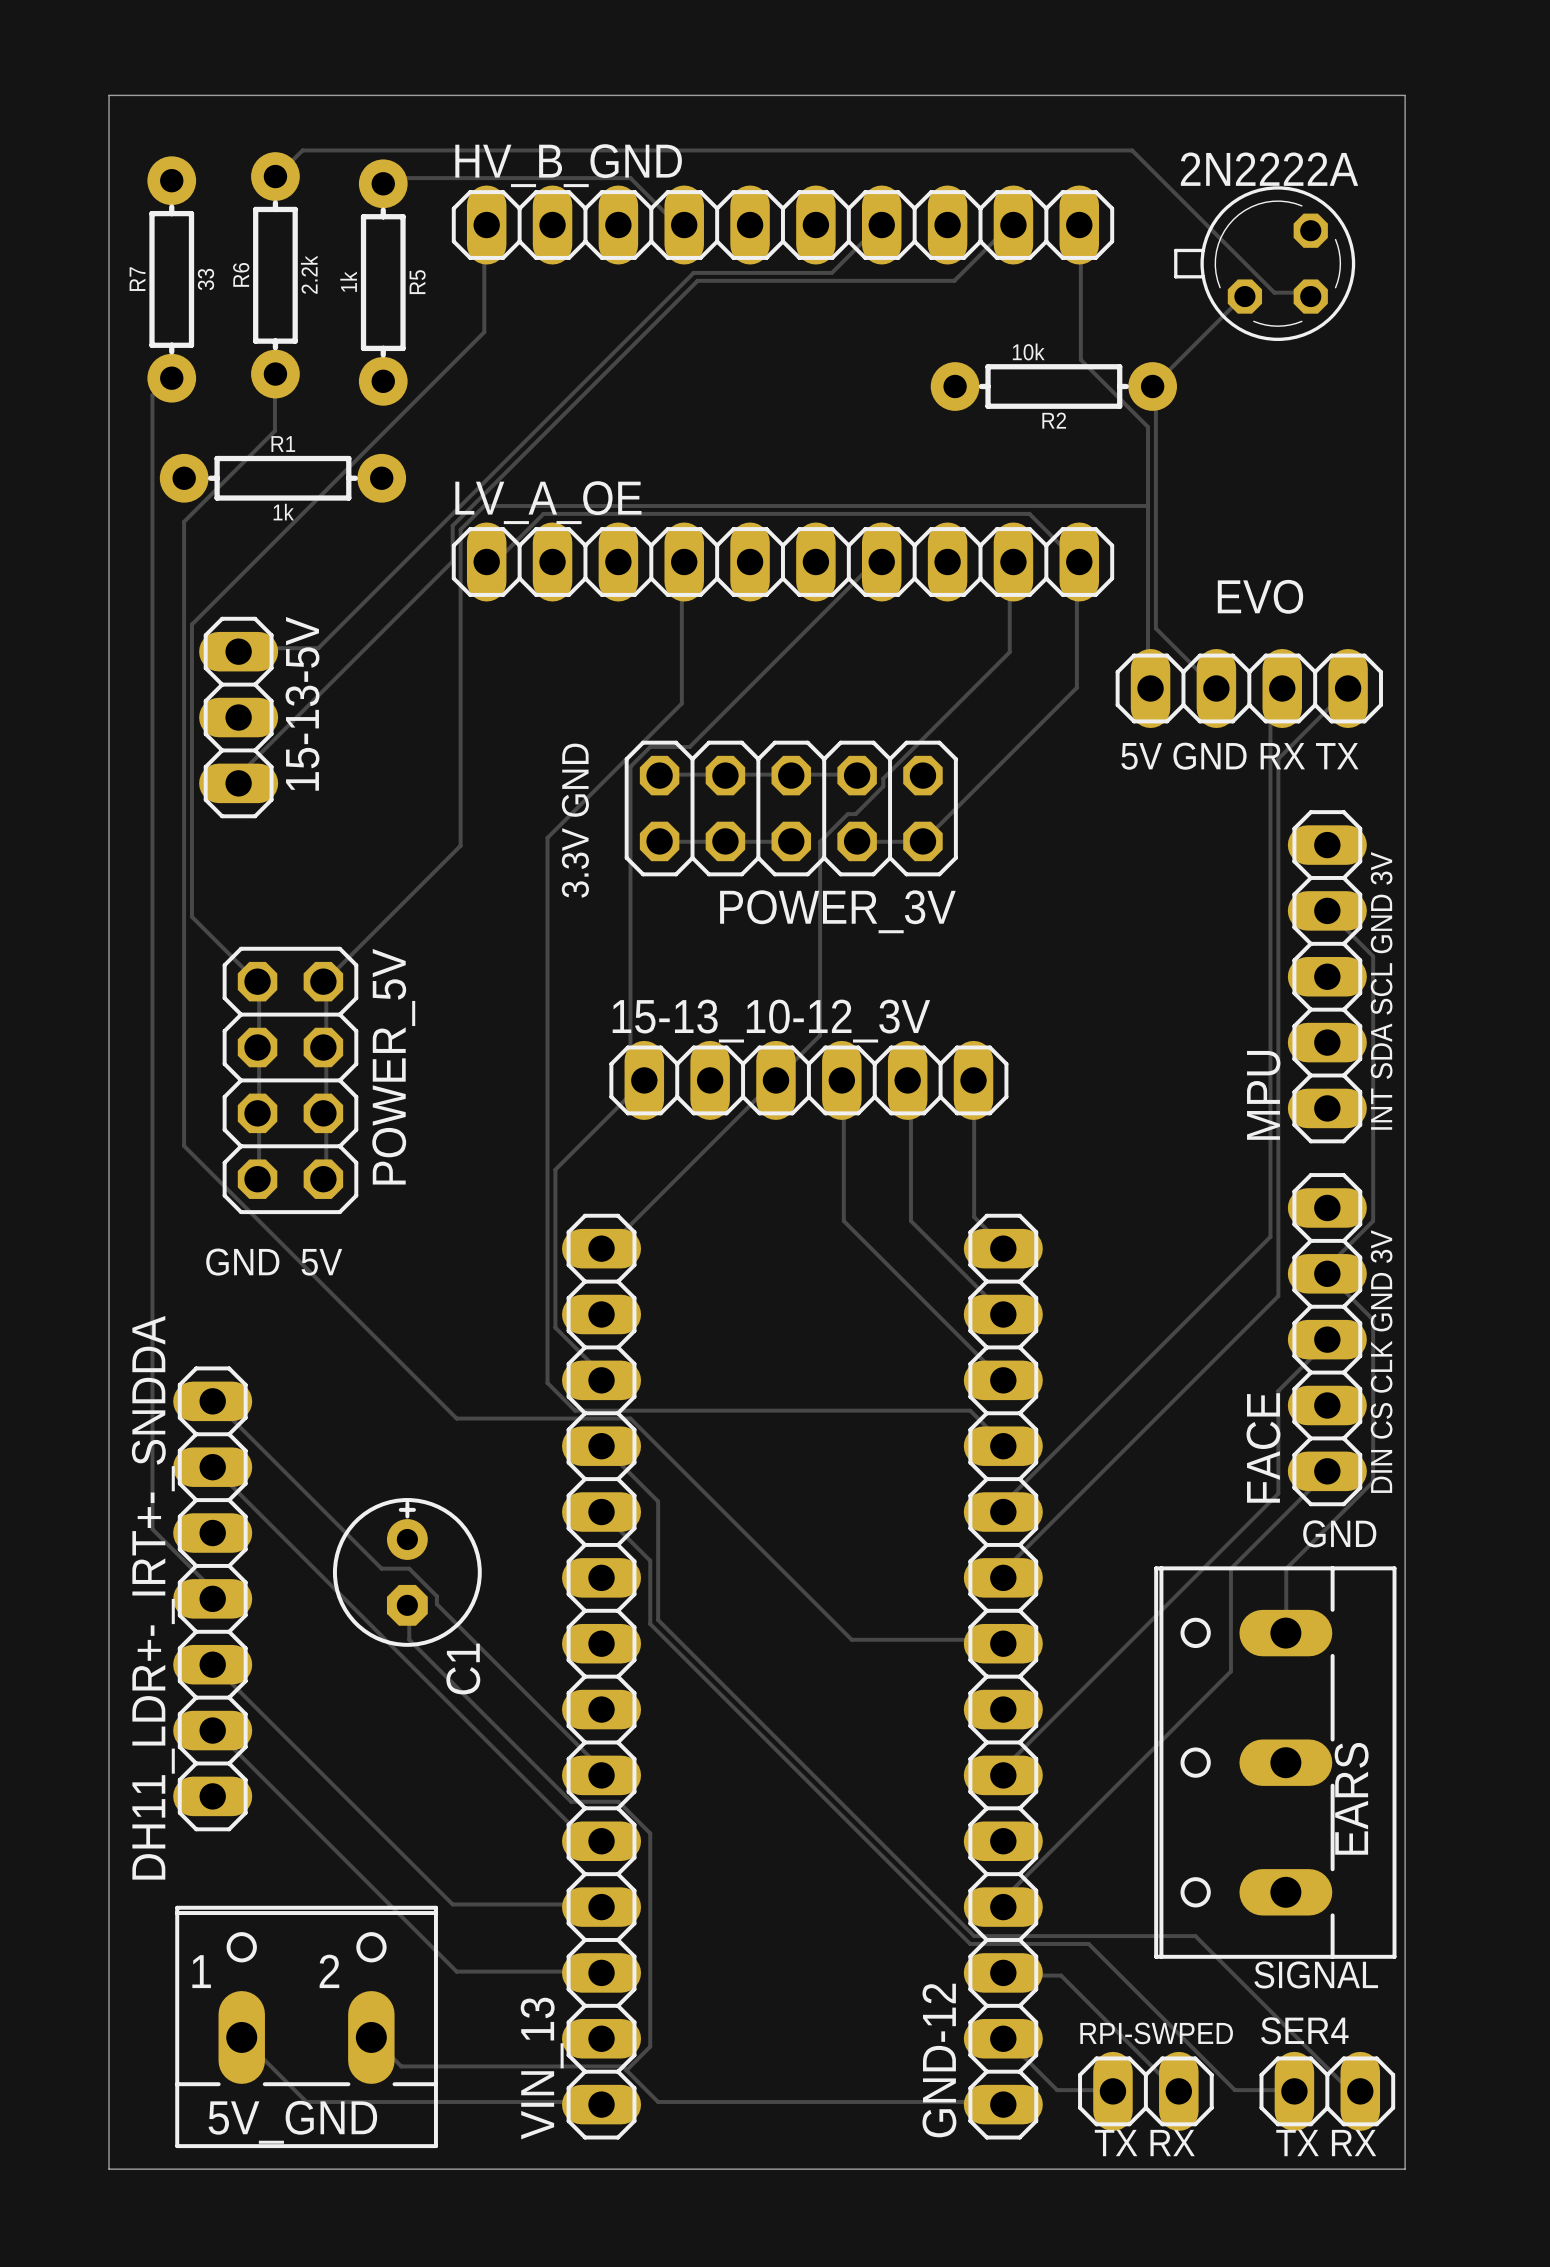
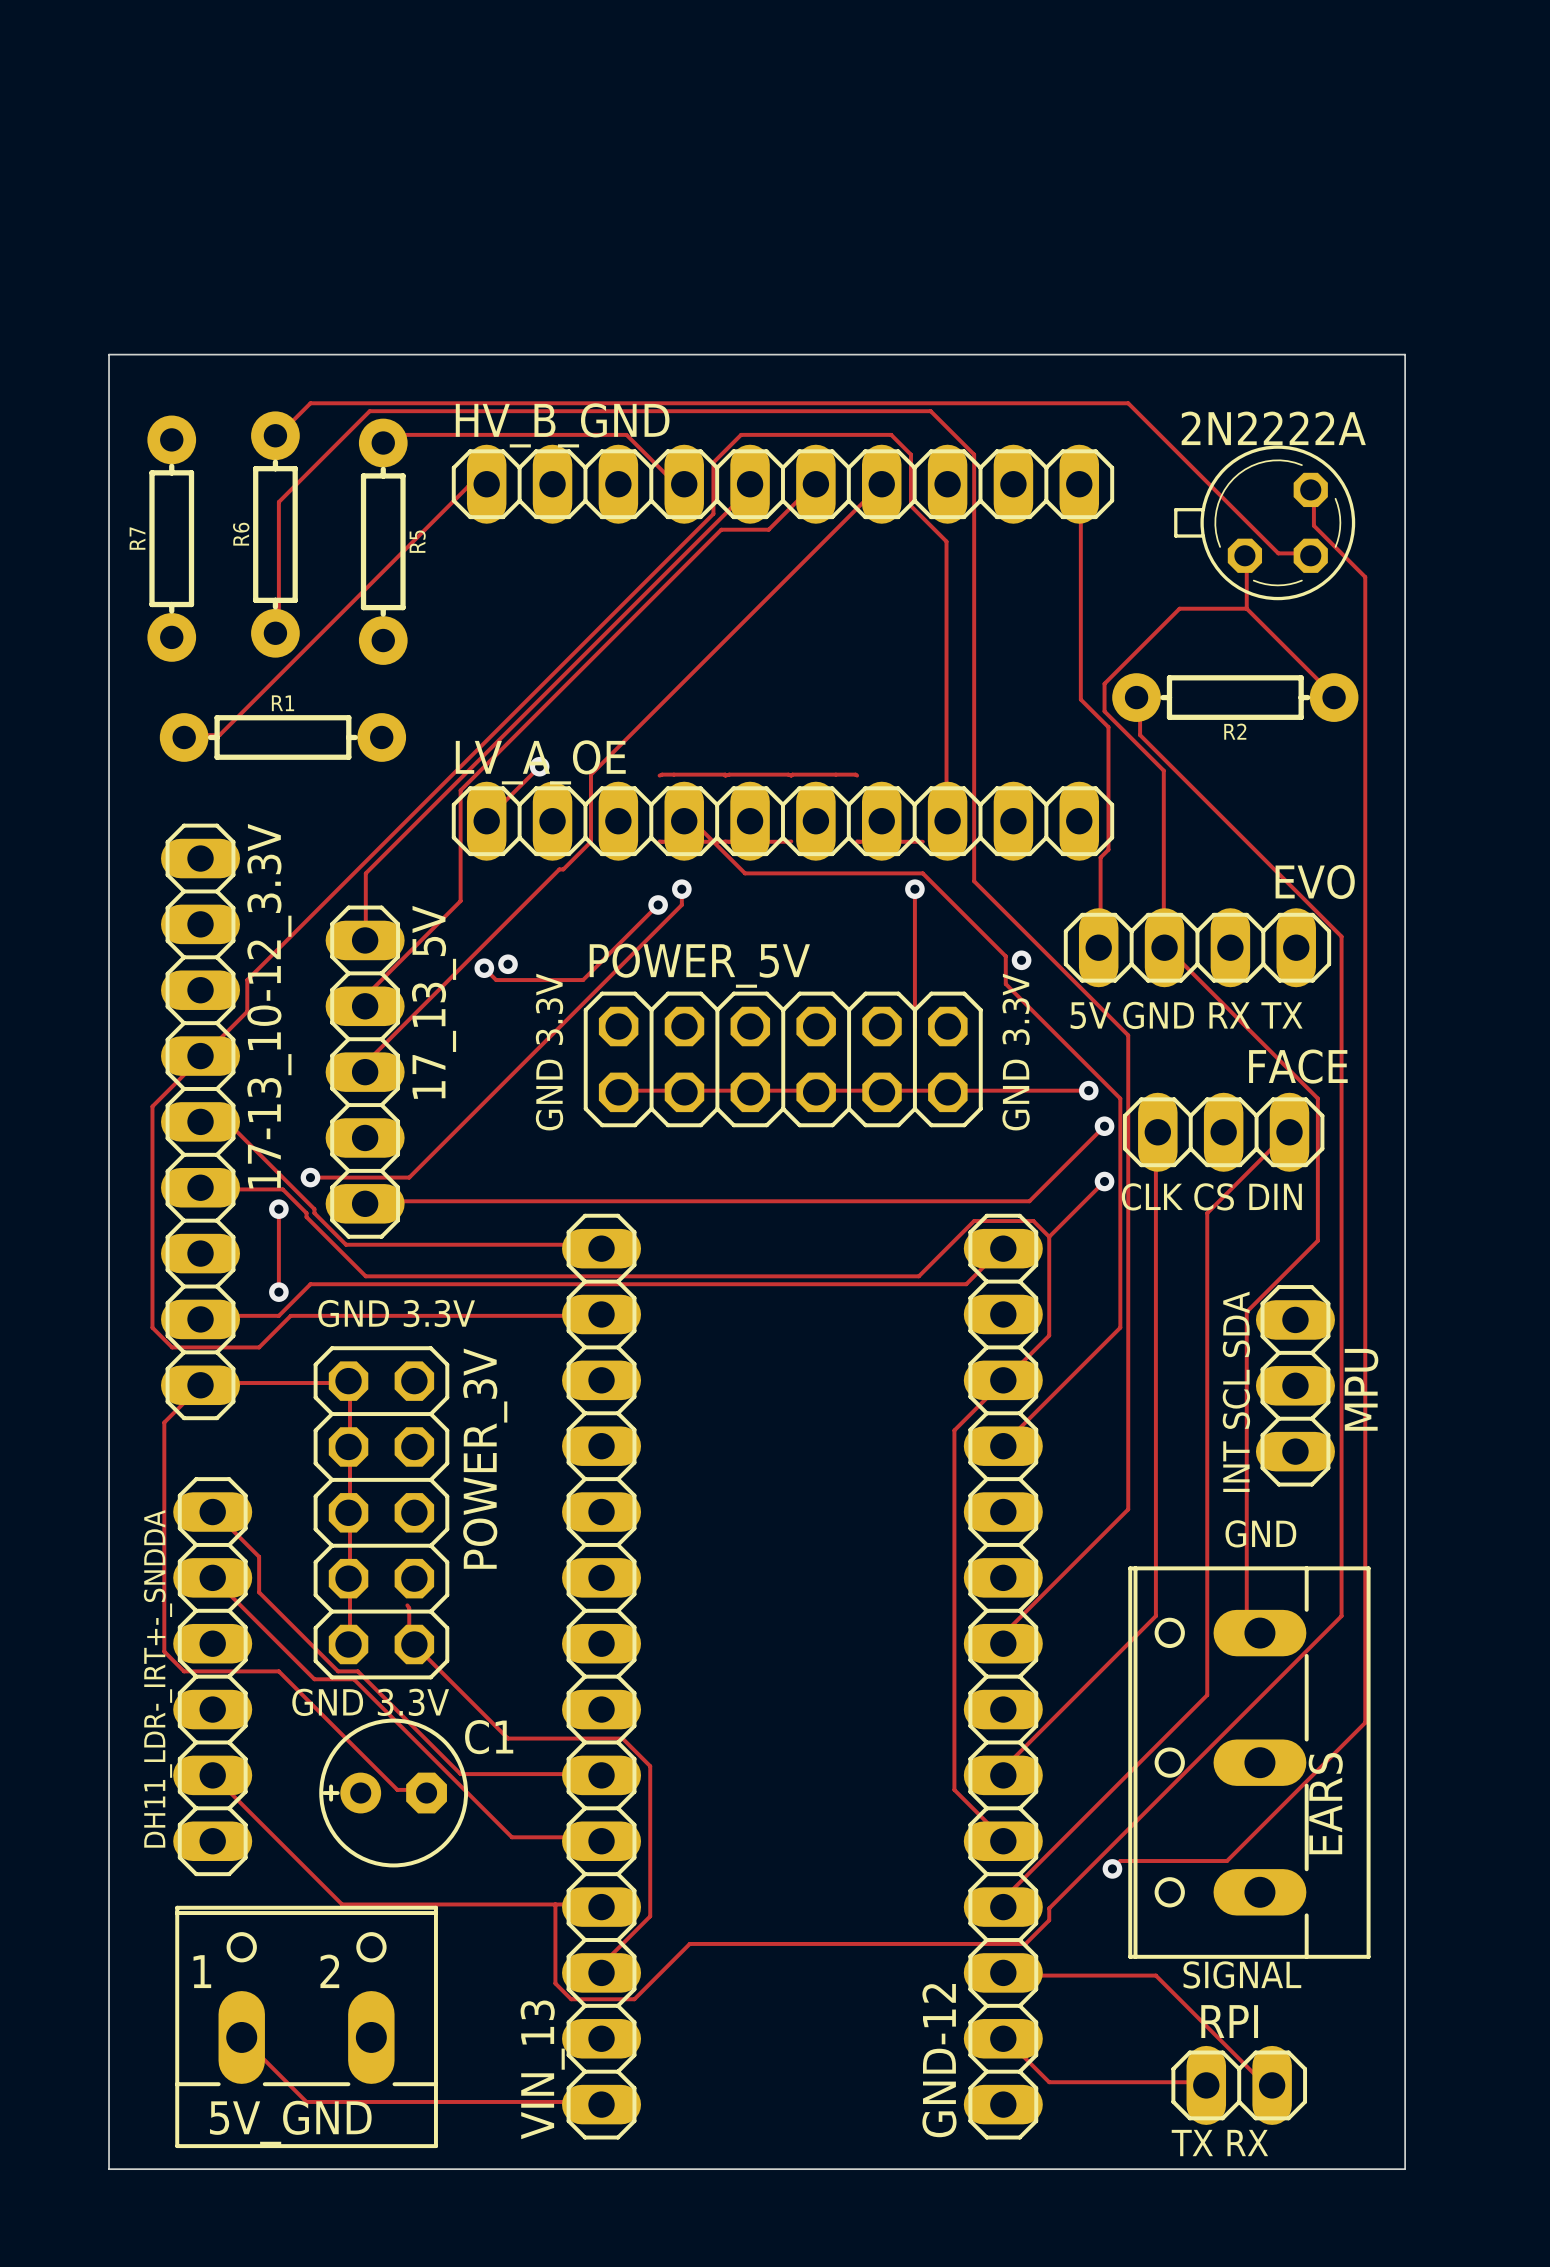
track: (275, 176) (302, 150) (1132, 150) (1274, 292) (1309, 292) (1310, 296) -> none
track: (383, 183) (389, 178) (630, 178) (673, 221) (681, 221) (684, 225) -> none
track: (486, 225) (484, 225) (484, 332) (191, 624) (191, 916) (259, 984) (259, 1047) (257, 1047) (259, 1051) (259, 1110) (257, 1113) (259, 1114) (259, 1177) (257, 1179) -> none
HV_B_GND position: (782, 225) -> (782, 484)
track: (881, 225) (831, 272) (693, 272) (318, 648) (239, 648) (238, 651) -> none
track: (1013, 225) (1009, 225) (954, 280) (697, 280) (452, 525) (452, 561) (239, 774) (238, 783) -> none
track: (1079, 225) (1080, 225) (1080, 359) (1147, 426) (1147, 687) (1150, 688) -> none
2N2222A position: (1264, 263) -> (1264, 522)
R6 value: 2.2k (309, 274) -> none
R6 position: (275, 275) -> (275, 534)
R7 position: (171, 279) -> (171, 538)
R7 value: 33 (205, 279) -> none
R5 value: 1k (348, 281) -> none
R5 position: (383, 282) -> (383, 541)
track: (1244, 296) (1152, 386) (1155, 387) (1155, 628) (1216, 688) -> none
R2 value: 10k (1028, 351) -> none
board edge: (109, 354) (109, 95) (1405, 95) (1405, 354) -> (109, 354) (1405, 354)
track: (275, 374) (274, 430) (184, 521) (184, 1145) (456, 1418) (630, 1418) (851, 1639) (1001, 1639) (1003, 1643) -> (275, 633) (278, 632) (278, 502) (369, 411) (930, 411) (974, 454) (974, 881) (1128, 1035) (1128, 1509) (1005, 1631) (1005, 1639) (1003, 1643)
track: (171, 378) (152, 395) (152, 1106) -> (947, 821) (946, 541) (910, 505) (910, 454) (891, 434) (741, 434) (713, 462) (713, 513) (247, 980) (247, 1011) (203, 1055) (200, 1056) (199, 1059) (152, 1106)
R2 position: (1053, 386) -> (1235, 697)
track: none -> (275, 435) (278, 434) (310, 403) (1128, 403) (1278, 553) (1309, 553) (1310, 555)
track: none -> (383, 443) (393, 434) (626, 434) (673, 482) (684, 484)
R1 position: (282, 478) -> (282, 737)
track: none -> (486, 484) (484, 486) (468, 486) (219, 735) (188, 735) (184, 737)
track: none -> (750, 484) (752, 486) (365, 873) (365, 940)
track: none -> (881, 484) (590, 774) (590, 841) (563, 869) (559, 869) (365, 1063) (365, 1072)
track: none -> (1079, 484) (1080, 486) (1080, 699) (1108, 727) (1108, 849) (1100, 857) (1100, 944) (1098, 947)
track: none -> (1310, 489) (1313, 490) (1313, 525) (1365, 577) (1365, 1722) (1227, 1861) (1120, 1861) (1112, 1868)
track: (1147, 505) (484, 505) (460, 529) (460, 790) -> (815, 484) (768, 529) (721, 529) (460, 790)
R1 value: 1k (283, 512) -> none
track: none -> (1244, 555) (1246, 557) (1246, 608)
track: (486, 561) (496, 561) (543, 513) (1029, 513) (1079, 561) (1076, 565) (1076, 687) (922, 841) -> none
track: (684, 561) (681, 565) (681, 703) (547, 837) (547, 1383) (575, 1410) (970, 1410) (1001, 1442) (1003, 1446) -> (684, 821) (693, 822) (745, 873) (922, 873) (1005, 956) (1005, 984) (1120, 1098) (1120, 1327) (1003, 1446)
LV_A_OE position: (782, 561) -> (782, 821)
track: (881, 561) (879, 565) (871, 565) (689, 746) (650, 746) (630, 766) (630, 1066) (644, 1080) (555, 1169) (555, 1327) (598, 1371) (598, 1379) (601, 1380) -> none
track: (1013, 561) (1009, 565) (1009, 652) (883, 778) (883, 786) (855, 814) (847, 814) (820, 841) (820, 1035) (610, 1244) (602, 1244) (601, 1248) -> (200, 1121) (227, 1122) (314, 1209) (314, 1213) (346, 1244) (598, 1244) (601, 1248)
EVO name position: EVO (1260, 596) -> EVO (1315, 881)
track: none -> (1246, 608) (1334, 697)
track: none -> (1246, 608) (1179, 608) (1104, 683) (1104, 711) (1163, 770) (1164, 947) (1167, 948) (1317, 1098) (1317, 1240) (1246, 1311) (1246, 1620) (1259, 1633)
EVO position: (1249, 688) -> (1197, 947)
track: (1282, 688) (1270, 699) (1270, 1236) (1005, 1501) (1005, 1509) (1003, 1512) -> none
track: (1348, 688) (1278, 758) (1278, 1296) (1005, 1568) (1005, 1576) (1003, 1577) -> none
15-13-5V: (238, 717) -> none
text position: 5V GND RX TX (1239, 756) -> 5V GND RX TX (1186, 1015)
track: none -> (539, 766) (486, 821)
via: none -> (539, 766)
POWER_3V rotation: 0° (791, 808) -> 90° clockwise (381, 1512)
POWER_3V position: (791, 808) -> (381, 1512)
text: 3.3V GND (575, 820) -> none
track: (460, 845) (323, 981) (326, 984) (326, 1047) (323, 1047) (326, 1051) (326, 1110) (323, 1113) (326, 1114) (326, 1177) (323, 1179) -> (460, 845) (460, 901) (365, 995) (365, 1006)
track: none -> (681, 889) (681, 904) (409, 1177) (310, 1177)
via: none -> (681, 889)
track: none -> (914, 889) (914, 1027)
via: none -> (914, 889)
track: none -> (658, 904) (583, 980) (496, 980) (484, 968)
via: none -> (658, 904)
track: (1327, 910) (1373, 956) (1373, 1221) (1329, 1264) (1329, 1272) (1327, 1273) (1373, 1319) (1373, 1481) (1286, 1568) (1285, 1633) -> none
POWER_3V name position: POWER_3V (837, 911) -> POWER_3V (485, 1458)
POWER_5V footprint: [222, 946, 359, 1215] -> [583, 991, 983, 1128]
via: none -> (1021, 960)
via: none -> (508, 964)
via: none -> (484, 968)
MPU: (1327, 976) -> none
text: INT SDA SCL GND 3V (1381, 990) -> none
text: none -> GND 3.3V (549, 1052)
text: none -> GND 3.3V (1016, 1052)
POWER_5V name position: POWER_5V (393, 1066) -> POWER_5V (699, 965)
17_13_5V: none -> (365, 1072)
15-13_10-12_3V: (808, 1080) -> none
track: (841, 1080) (843, 1082) (843, 1221) (1003, 1380) -> none
track: (907, 1080) (910, 1082) (910, 1221) (1003, 1314) -> none
track: (973, 1080) (974, 1217) (1001, 1244) (1003, 1248) -> (200, 1319) (203, 1315) (278, 1315) (310, 1284) (966, 1284) (1003, 1248)
track: none -> (1088, 1090) (950, 1090) (947, 1092) (946, 1090) (883, 1090) (882, 1092) (879, 1090) (820, 1090) (816, 1092) (816, 1090) (752, 1090) (750, 1092) (748, 1090) (685, 1090) (684, 1092) (681, 1090) (622, 1090) (618, 1092)
via: none -> (1088, 1090)
17-13_10-12_3.3V: none -> (200, 1121)
track: none -> (1104, 1126) (1029, 1201) (365, 1201) (365, 1203)
via: none -> (1104, 1126)
FACE: none -> (1223, 1132)
via: none -> (310, 1177)
track: none -> (1104, 1181) (1049, 1236)
via: none -> (1104, 1181)
track: none -> (200, 1187) (203, 1189) (282, 1189) (306, 1213) (306, 1217) (365, 1276) (918, 1276) (974, 1221) (1033, 1221) (1049, 1236)
text: none -> CLK CS DIN (1211, 1196)
track: none -> (278, 1209) (278, 1292)
via: none -> (278, 1209)
track: none -> (1049, 1236) (1049, 1335) (954, 1430) (954, 1789) (1001, 1837) (1003, 1841)
text: GND 5V (274, 1262) -> GND 3.3V (396, 1313)
via: none -> (278, 1292)
track: (152, 1327) (152, 1529) (211, 1588) (212, 1598) -> (152, 1327) (172, 1347) (259, 1347) (290, 1315) (601, 1314)
track: (1327, 1339) (1325, 1343) (1278, 1390) (1278, 1493) (1155, 1616) -> (1157, 1132) (1155, 1134) (1155, 1616)
FACE: (1327, 1339) -> none
text: DIN CS CLK GND 3V (1381, 1361) -> none
MPU: none -> (1295, 1385)
text: none -> INT SCL SDA (1236, 1391)
track: (212, 1401) (381, 1568) (409, 1568) (436, 1596) (436, 1604) (598, 1766) (598, 1774) -> (212, 1512) (259, 1556) (259, 1592) (338, 1671) (357, 1671) (460, 1774) (598, 1774)
track: (601, 1446) (658, 1501) (658, 1620) (974, 1936) (1195, 1936) (1349, 2090) (1360, 2091) -> none
track: (212, 1467) (583, 1837) -> (212, 1577) (314, 1679) (353, 1679) (511, 1837) (583, 1837)
track: (1327, 1471) (1230, 1568) (1230, 1671) (1207, 1695) -> (1289, 1132) (1207, 1213) (1207, 1695)
track: (601, 1512) (650, 1560) (650, 1623) (970, 1943) -> (555, 1904) (555, 1983) (571, 1999) (634, 1999) (689, 1943) (970, 1943)
text position: GND (1339, 1533) -> GND (1260, 1533)
C1 rotation: 0° (407, 1572) -> 90° counterclockwise (393, 1793)
C1 position: (407, 1572) -> (393, 1793)
DH11_LDR+-_IRT+-_SNDDA: (212, 1598) -> none
track: none -> (348, 1644) (350, 1383) (348, 1381) (346, 1383) (203, 1383) (164, 1422) (164, 1651) (184, 1671) (278, 1671) (397, 1789) (425, 1789) (426, 1793)
track: (212, 1664) (452, 1904) -> (212, 1775) (342, 1904) (452, 1904)
DH11_LDR-_IRT+-_SNDDA: none -> (212, 1676)
text: none -> GND 3.3V (370, 1702)
track: (212, 1730) (215, 1730) (456, 1971) (601, 1972) -> none
track: (508, 1738) (571, 1801) (618, 1801) (650, 1833) -> (508, 1738) (622, 1738) (650, 1766) (650, 1833)
EARS position: (1275, 1762) -> (1249, 1762)
via: none -> (1112, 1868)
track: (650, 1916) (650, 2046) (626, 2070) -> (650, 1916) (602, 1963) (601, 1972)
track: (1025, 1943) (1088, 1943) (1234, 2090) (1294, 2091) -> (1025, 1943) (1049, 1920) (1049, 1908) (1341, 1616) (1341, 936) (1140, 735) (1140, 699) (1136, 697)
text position: SIGNAL (1316, 1974) -> SIGNAL (1242, 1974)
track: (1061, 1975) (1178, 2091) -> (1061, 1975) (1155, 1975) (1262, 2082) (1270, 2082) (1272, 2085)
track: (371, 2037) (401, 2066) (622, 2066) (658, 2101) (1001, 2101) (1003, 2104) -> none
track: (1049, 2082) (1057, 2090) (1112, 2091) -> (1049, 2082) (1203, 2082) (1206, 2085)
RPI: none -> (1239, 2085)
RPI-SWPED: (1145, 2091) -> none
SER4: (1327, 2091) -> none
text: TX RX (1144, 2143) -> none
text: none -> TX RX (1219, 2143)
text: TX RX (1326, 2143) -> none

